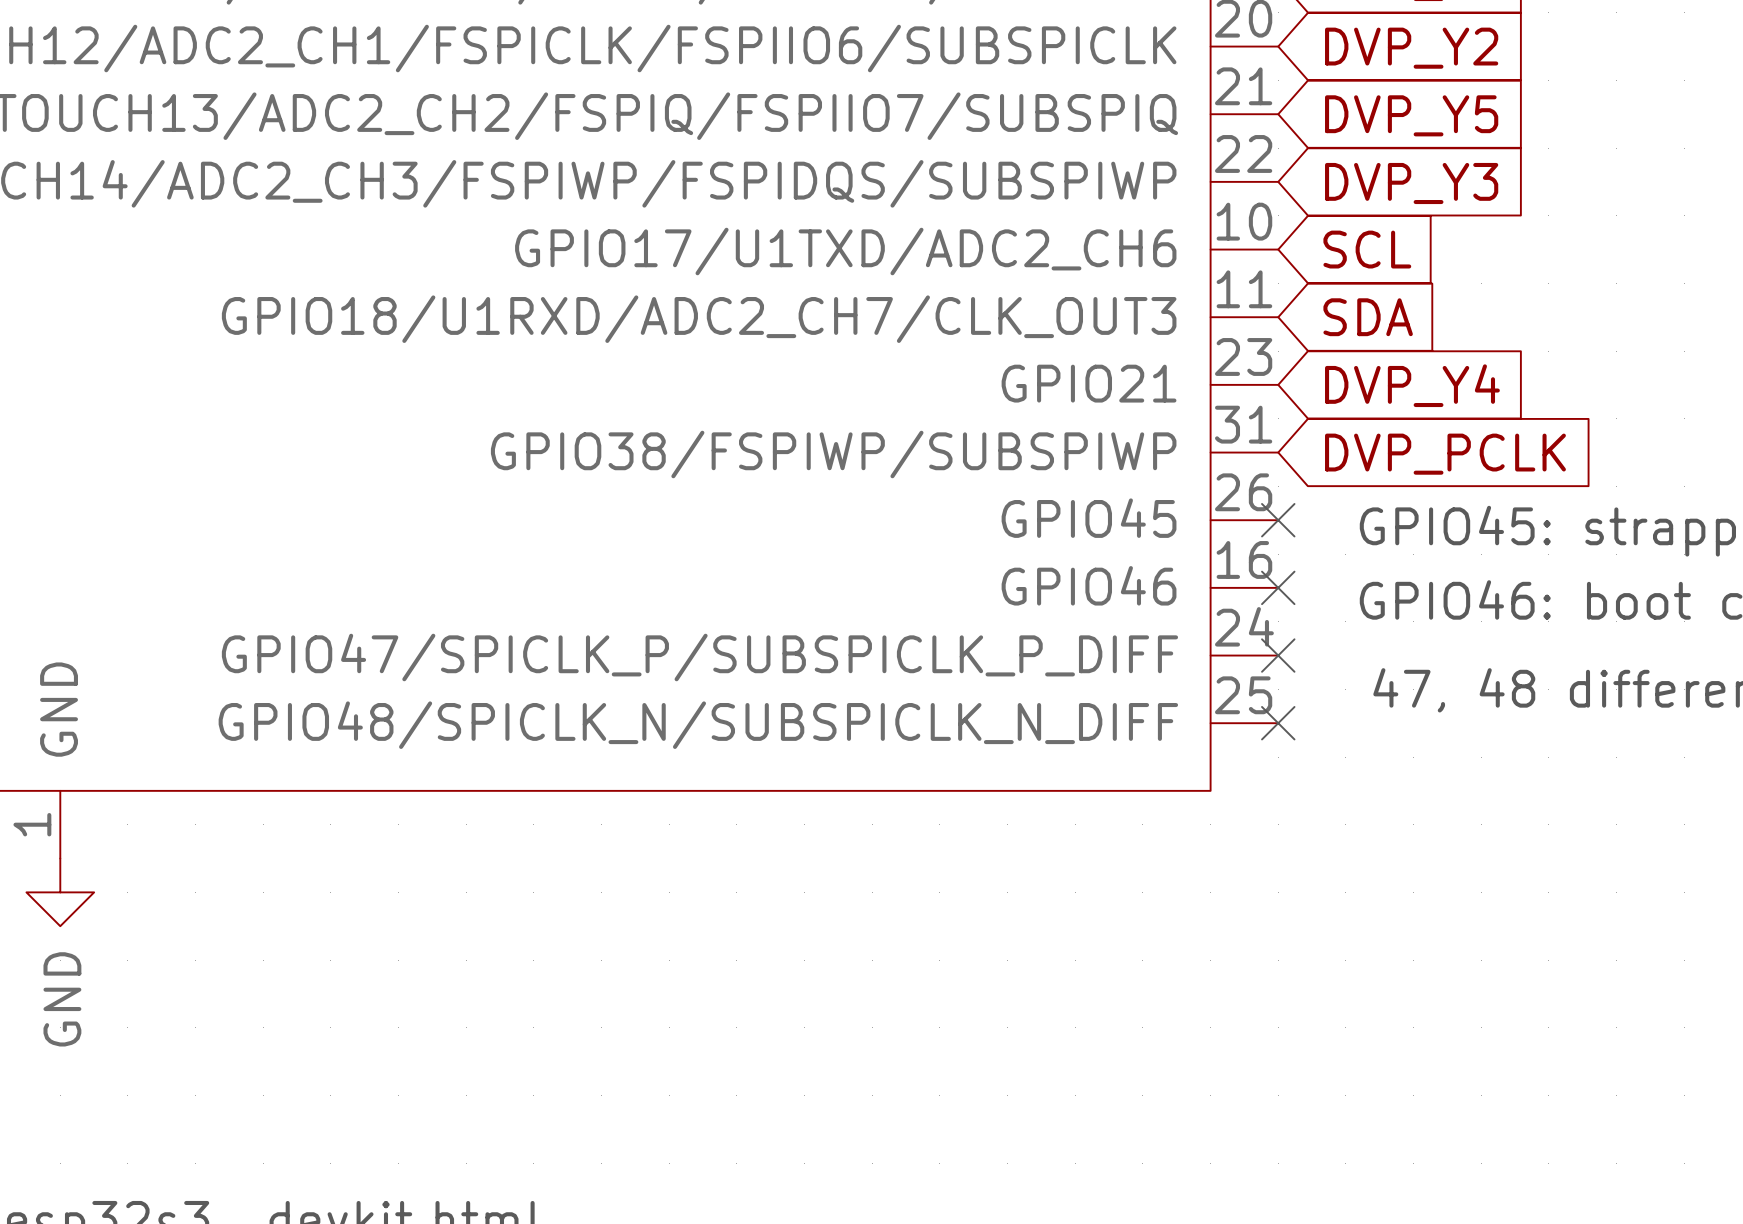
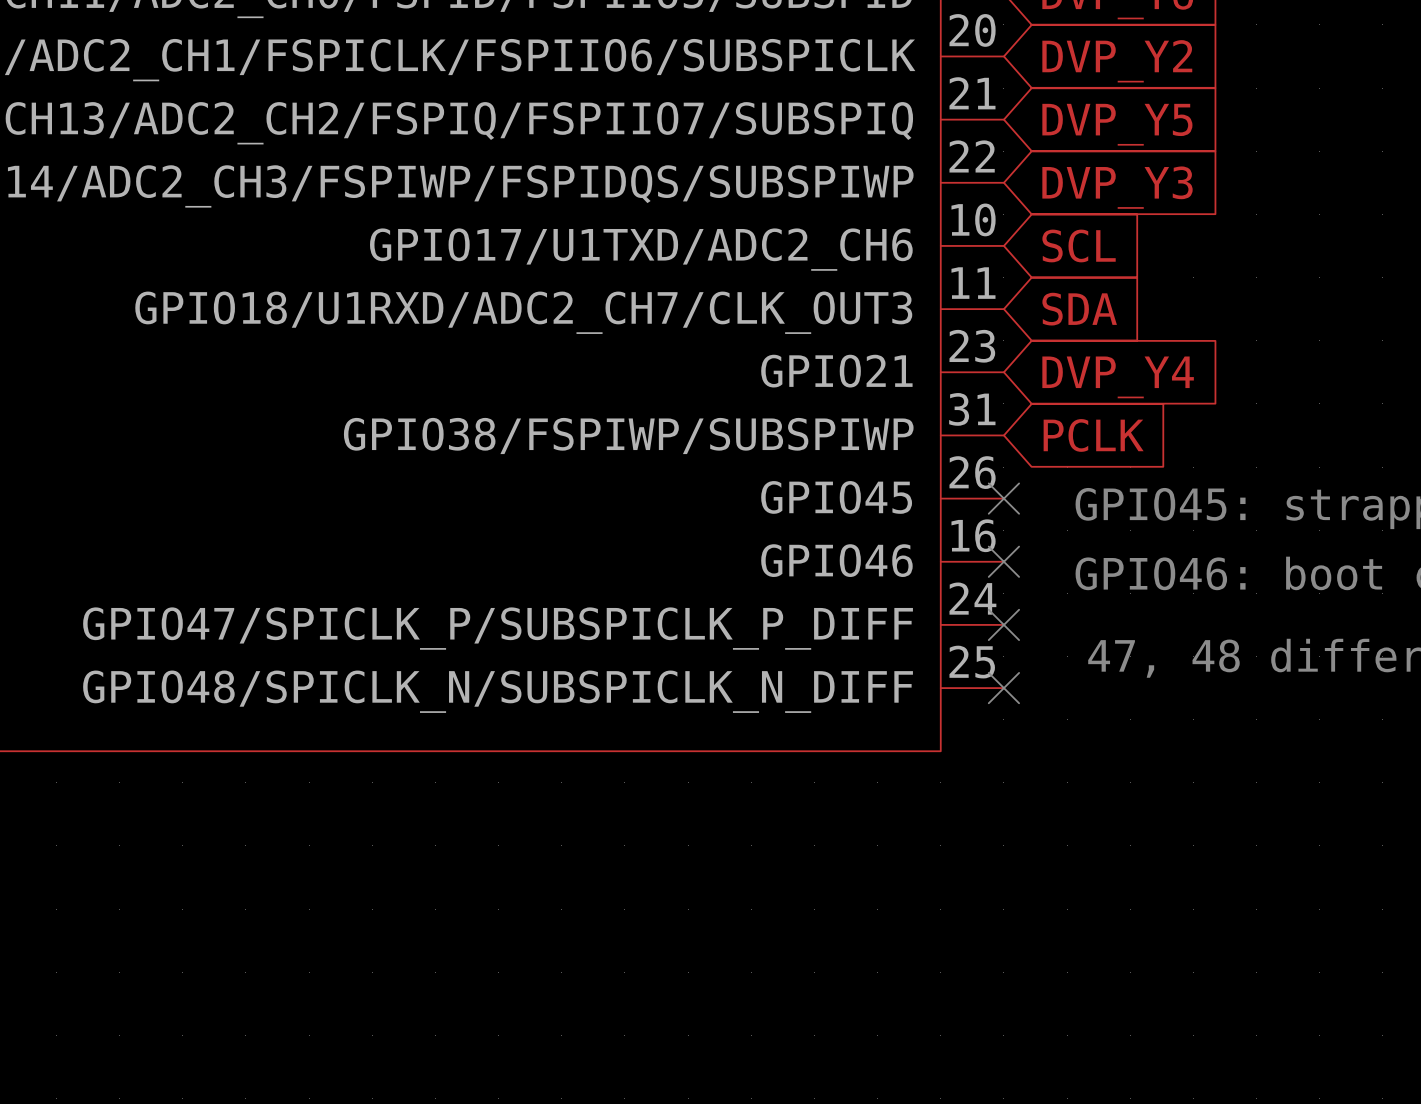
global label: DVP_PCLK (1445, 454) -> PCLK (1093, 435)

